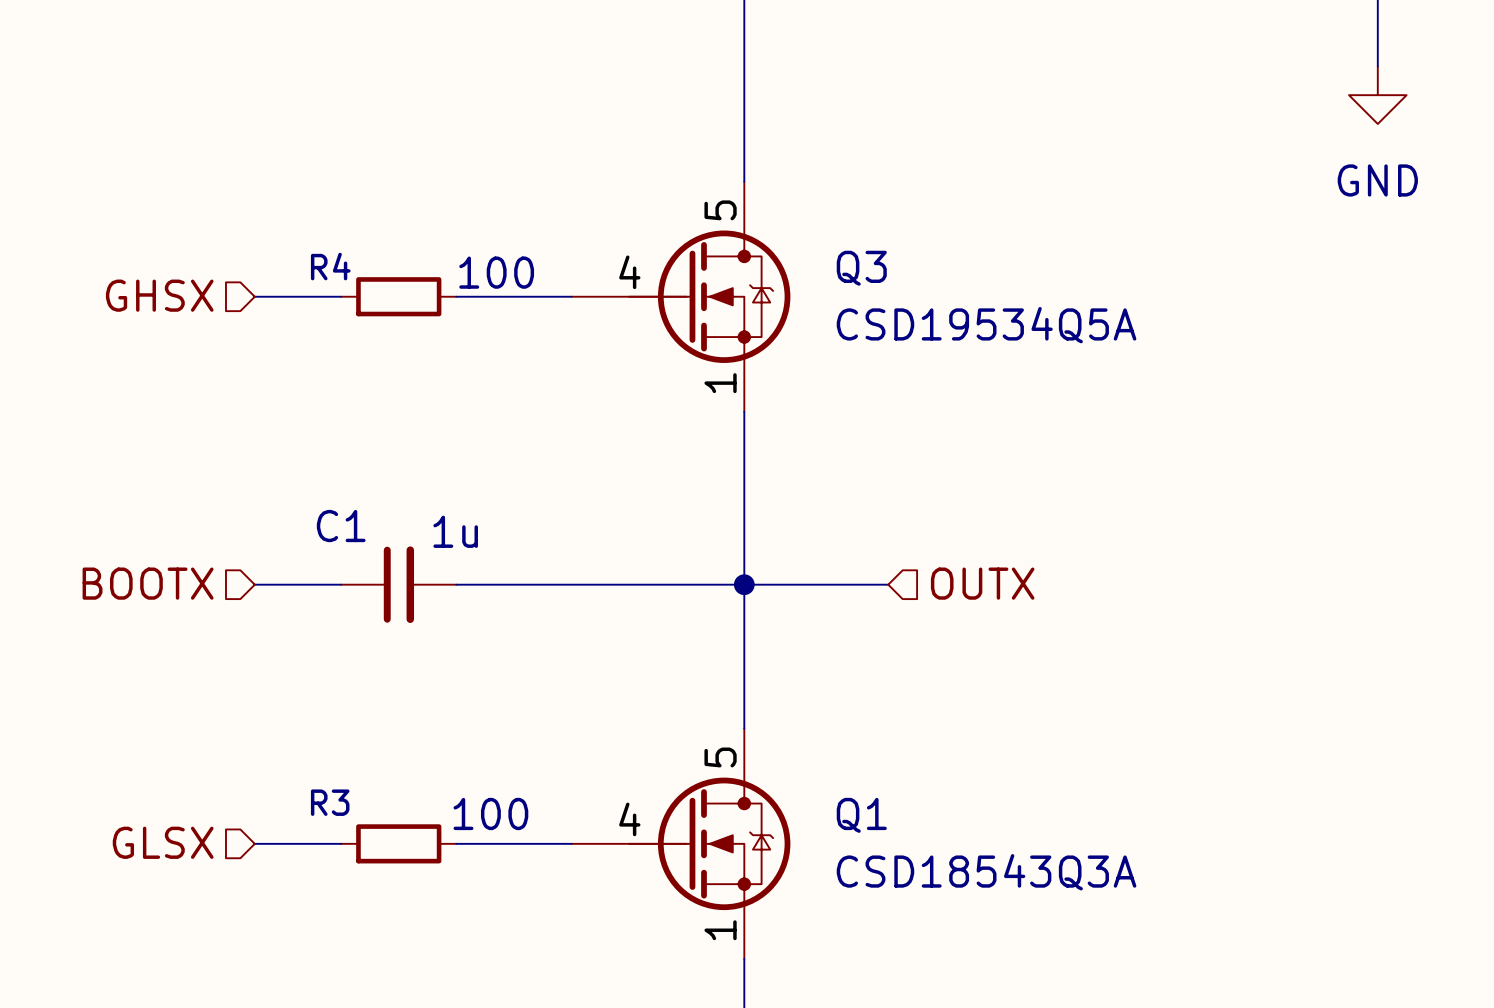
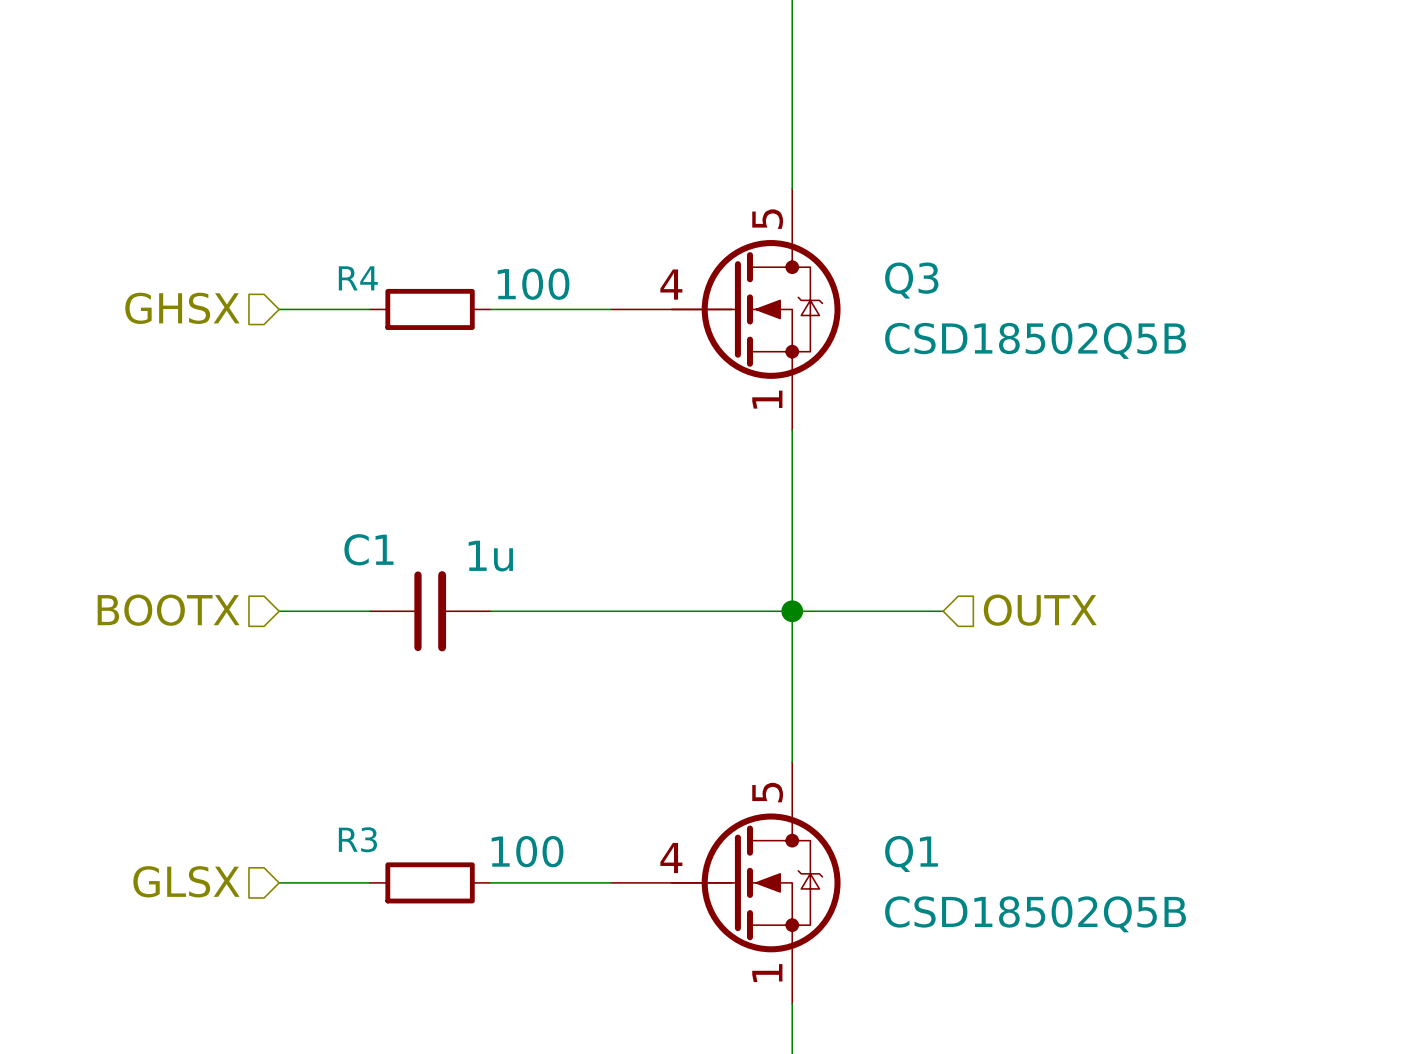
Q3 value: CSD19534Q5A (986, 325) -> CSD18502Q5B (1035, 340)
Q1 value: CSD18543Q3A (986, 872) -> CSD18502Q5B (1035, 914)

